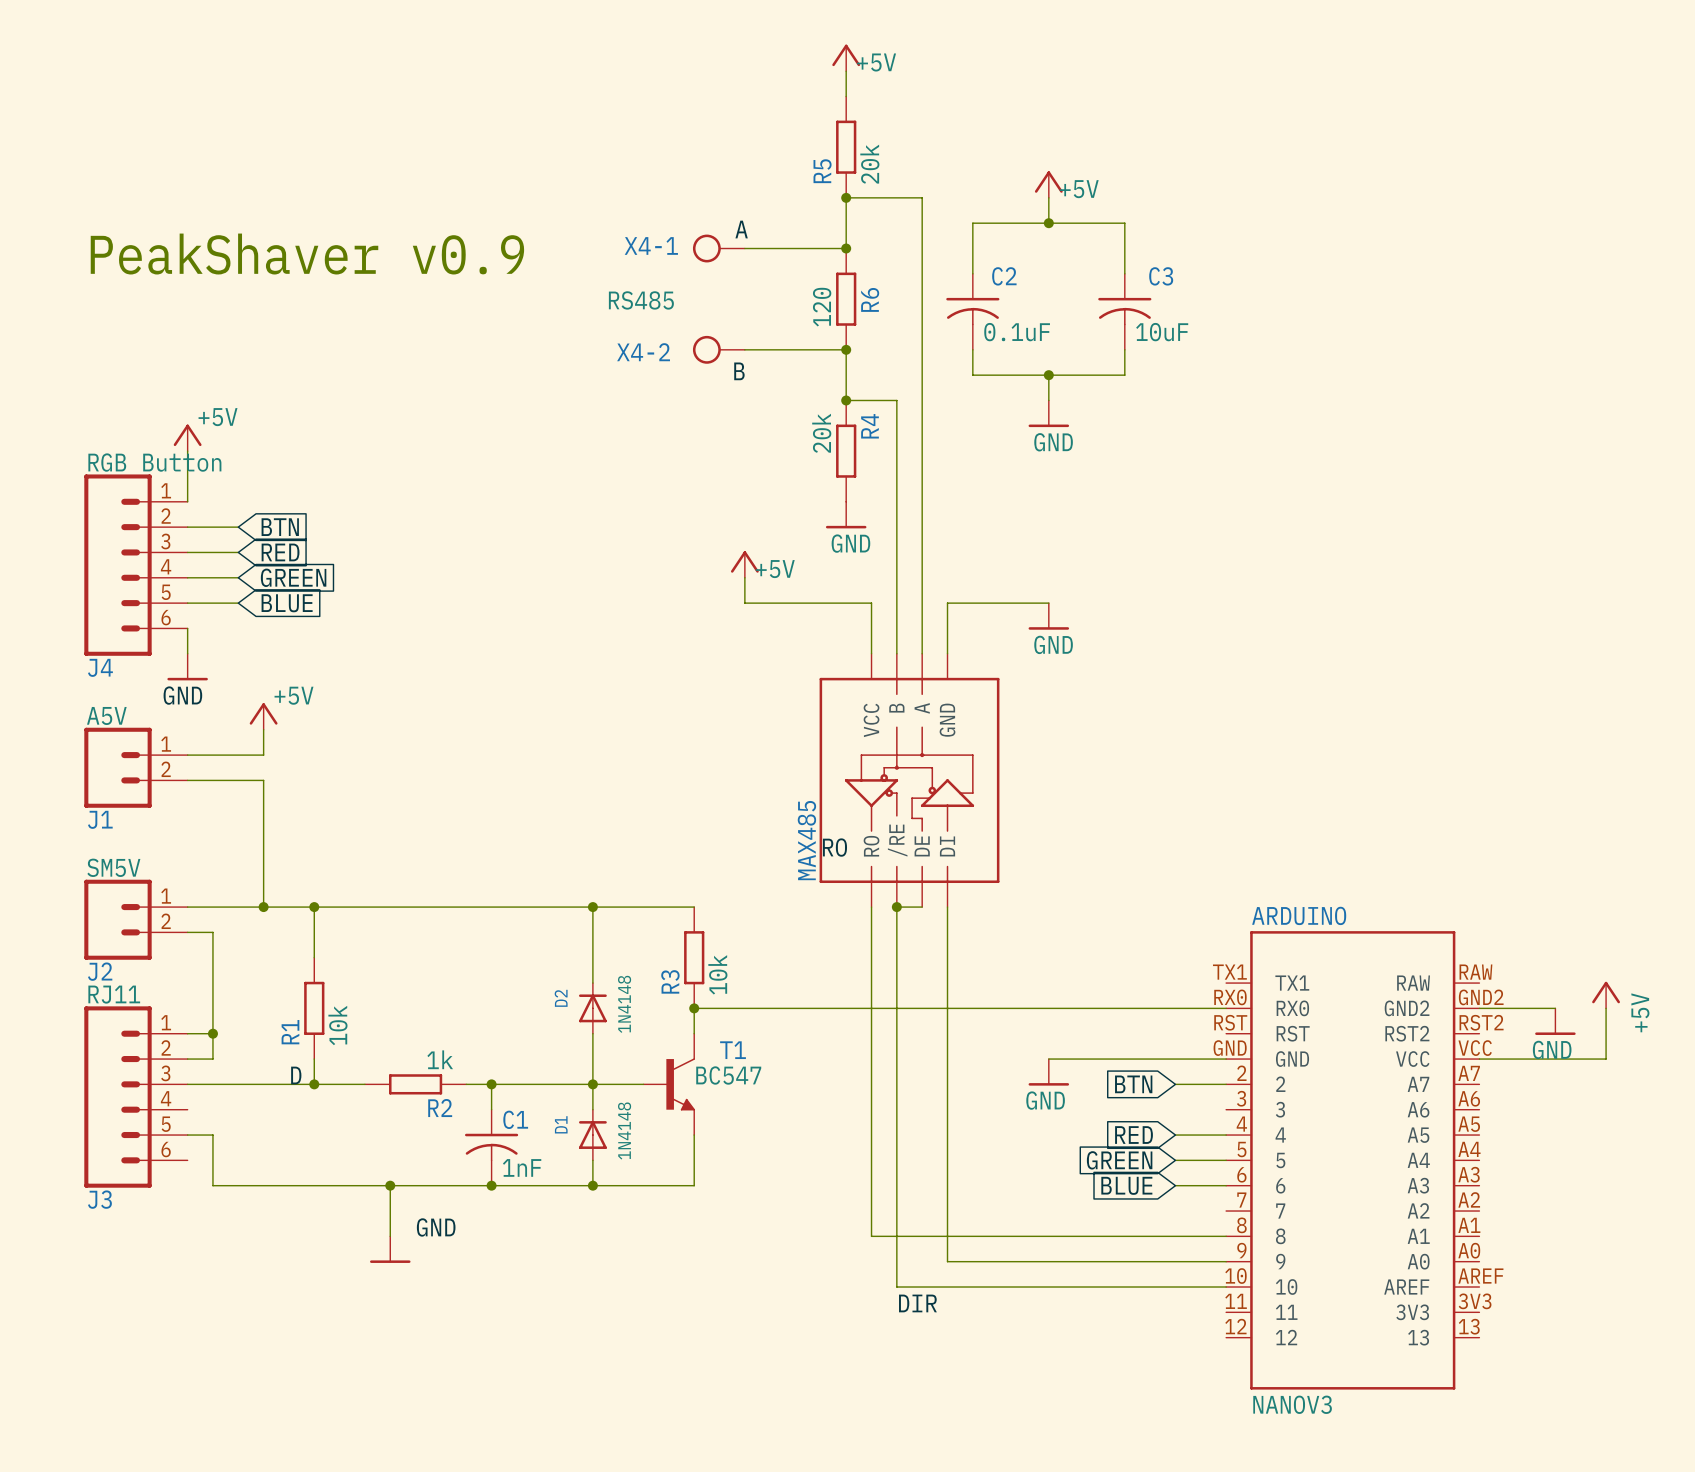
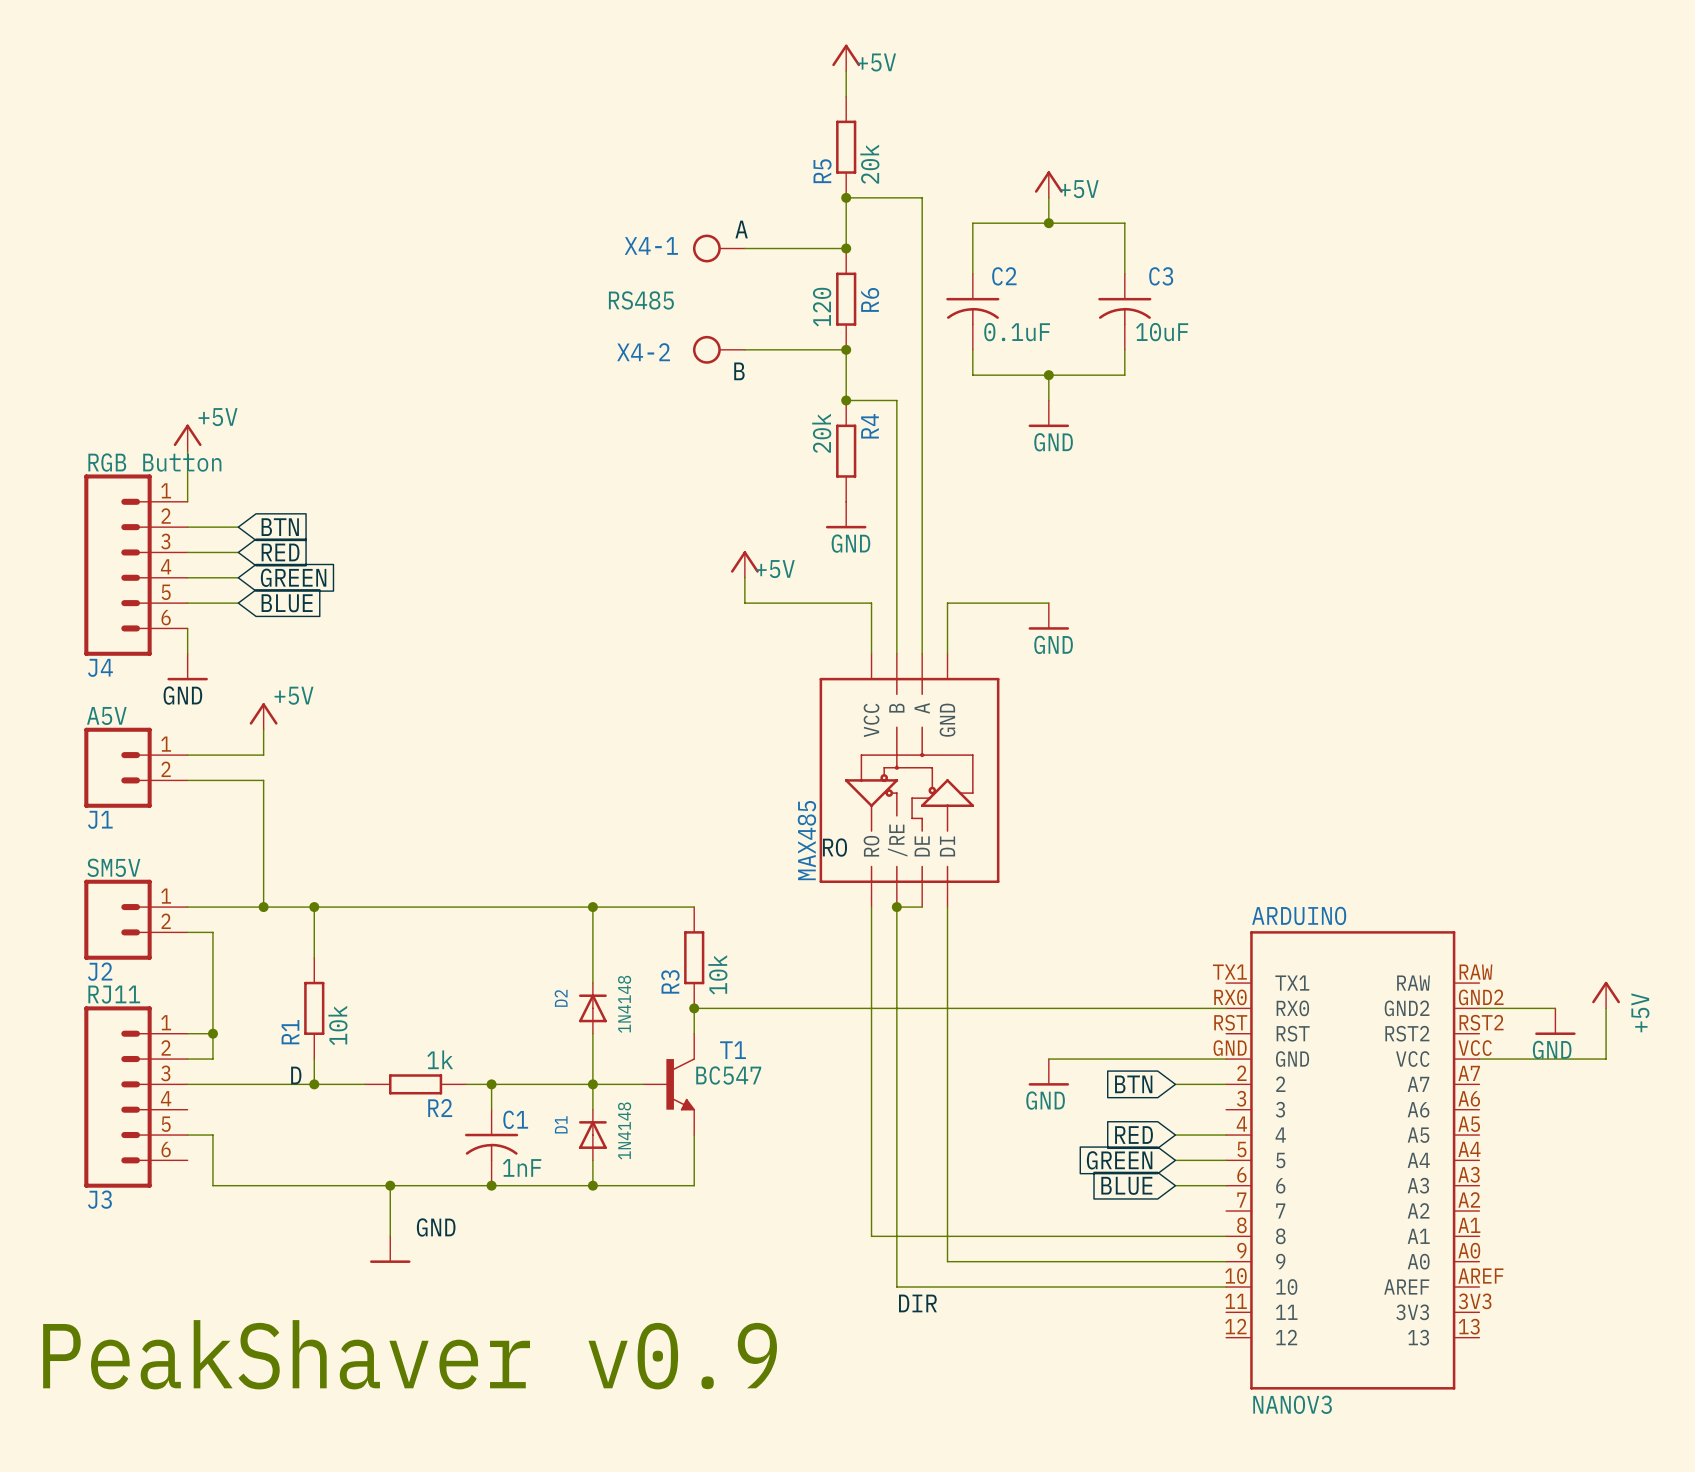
text: PeakShaver v0.9 (307, 254) -> none
text: none -> PeakShaver v0.9 (410, 1354)

